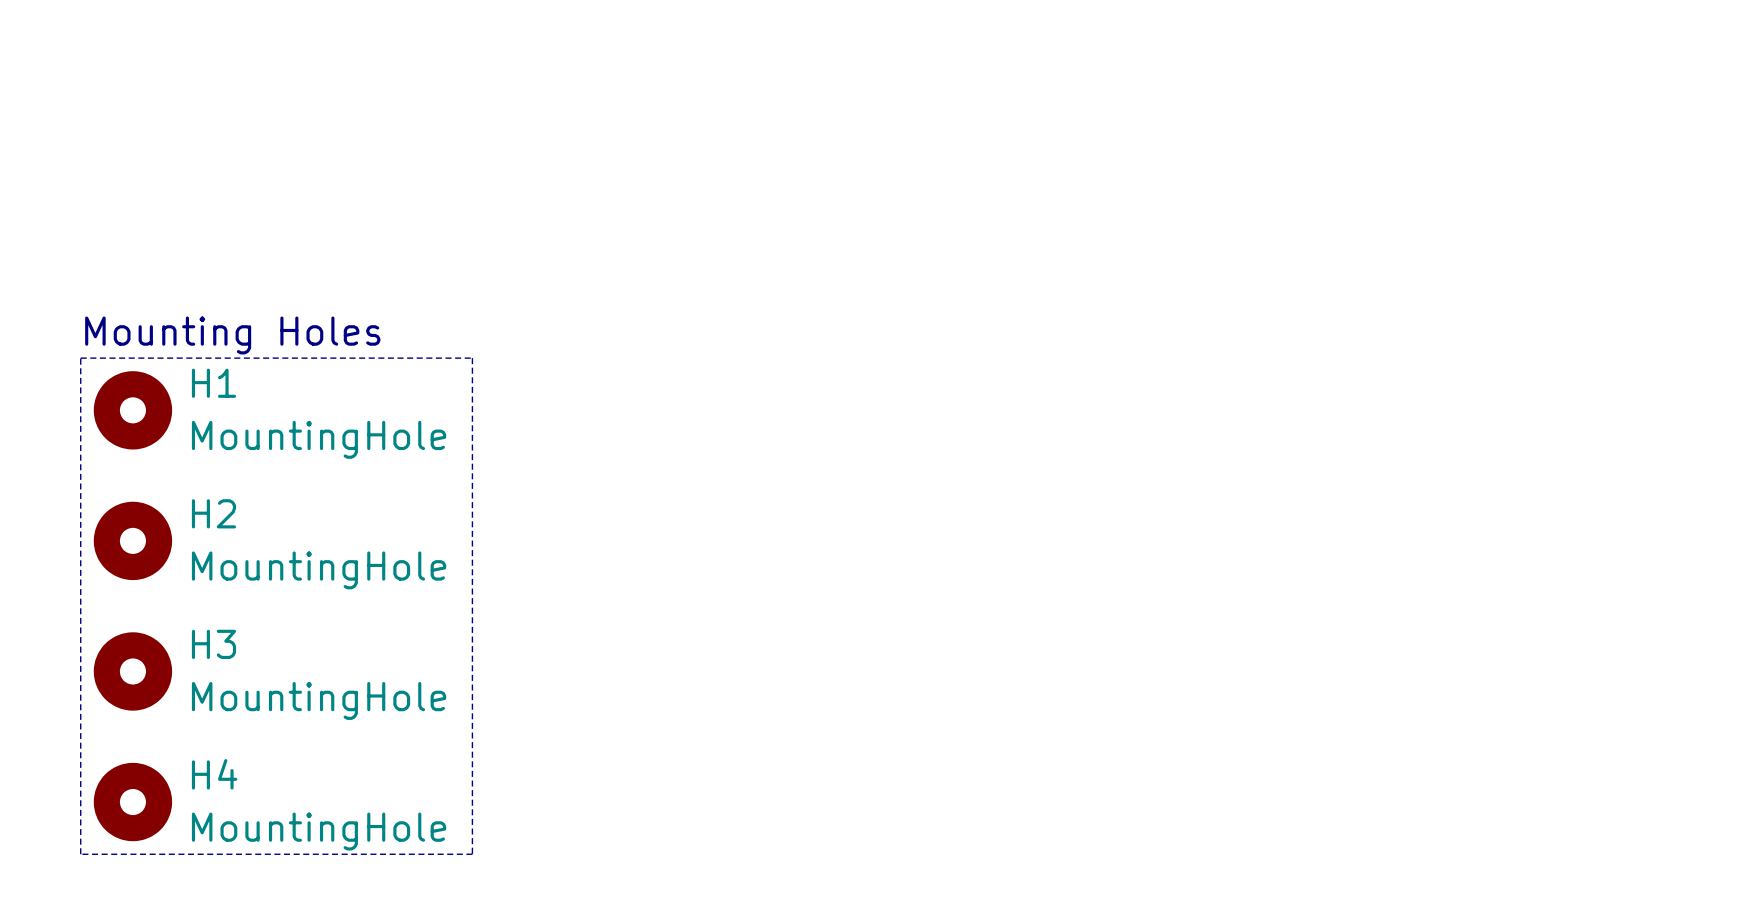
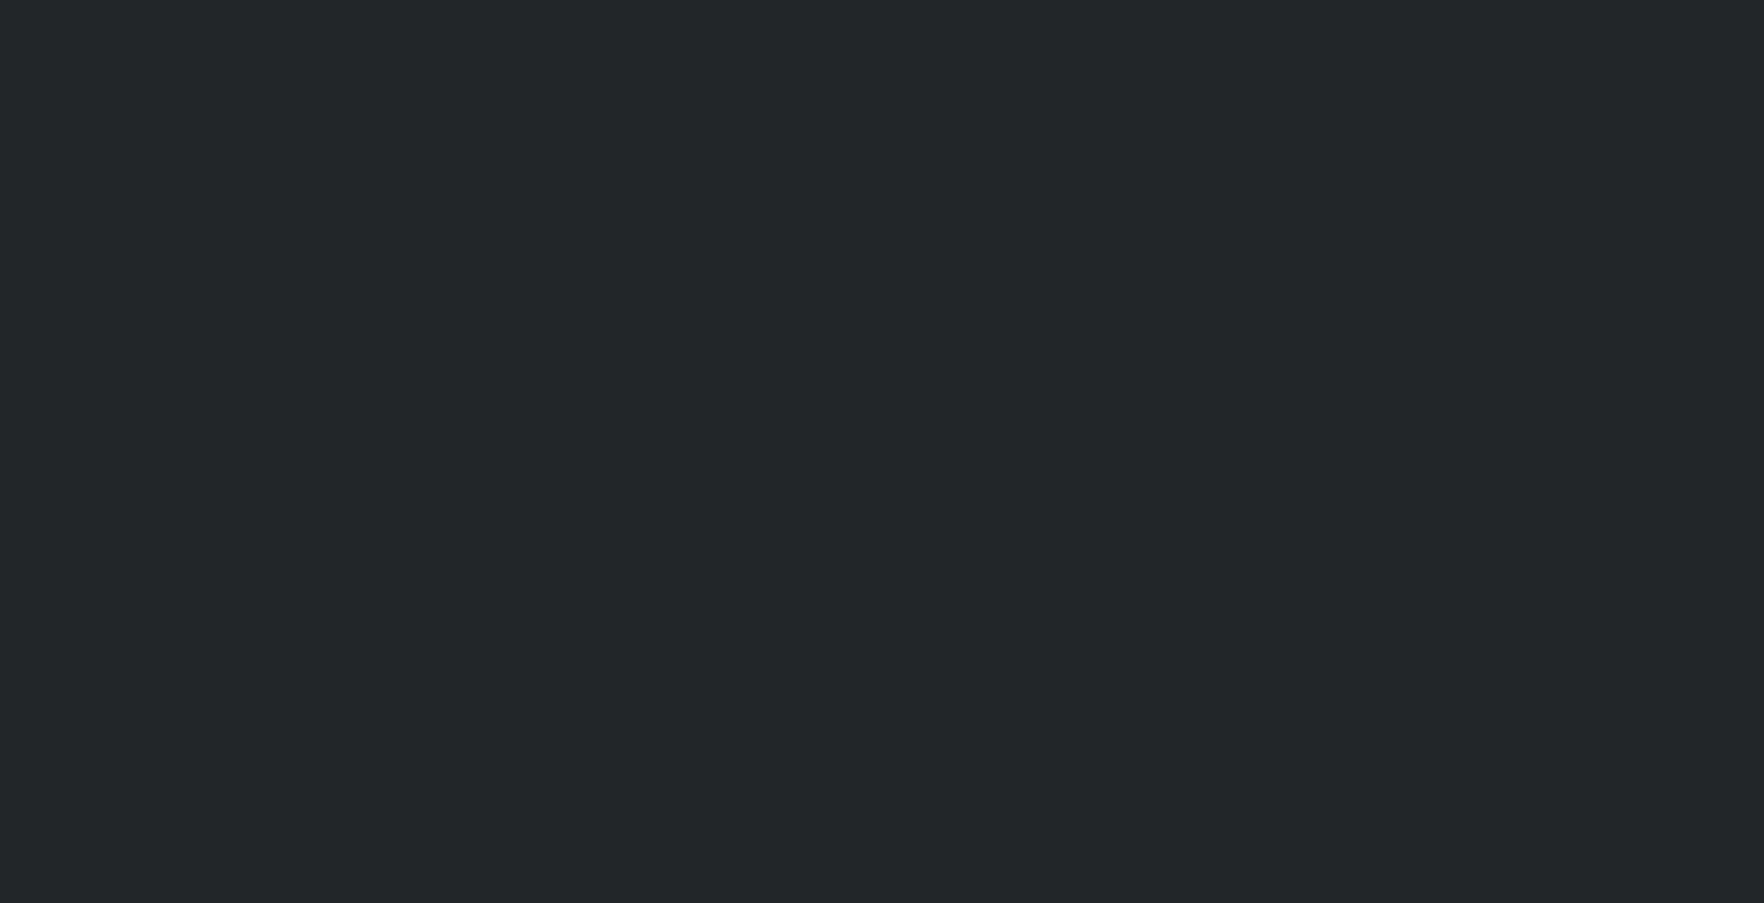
text: Mounting Holes (232, 335) -> none
line: (80, 358) (472, 358) (472, 854) (80, 854) (80, 358) -> none
H1: MountingHole (132, 410) -> none
H2: MountingHole (132, 540) -> none
H3: MountingHole (132, 671) -> none
H4: MountingHole (132, 802) -> none

